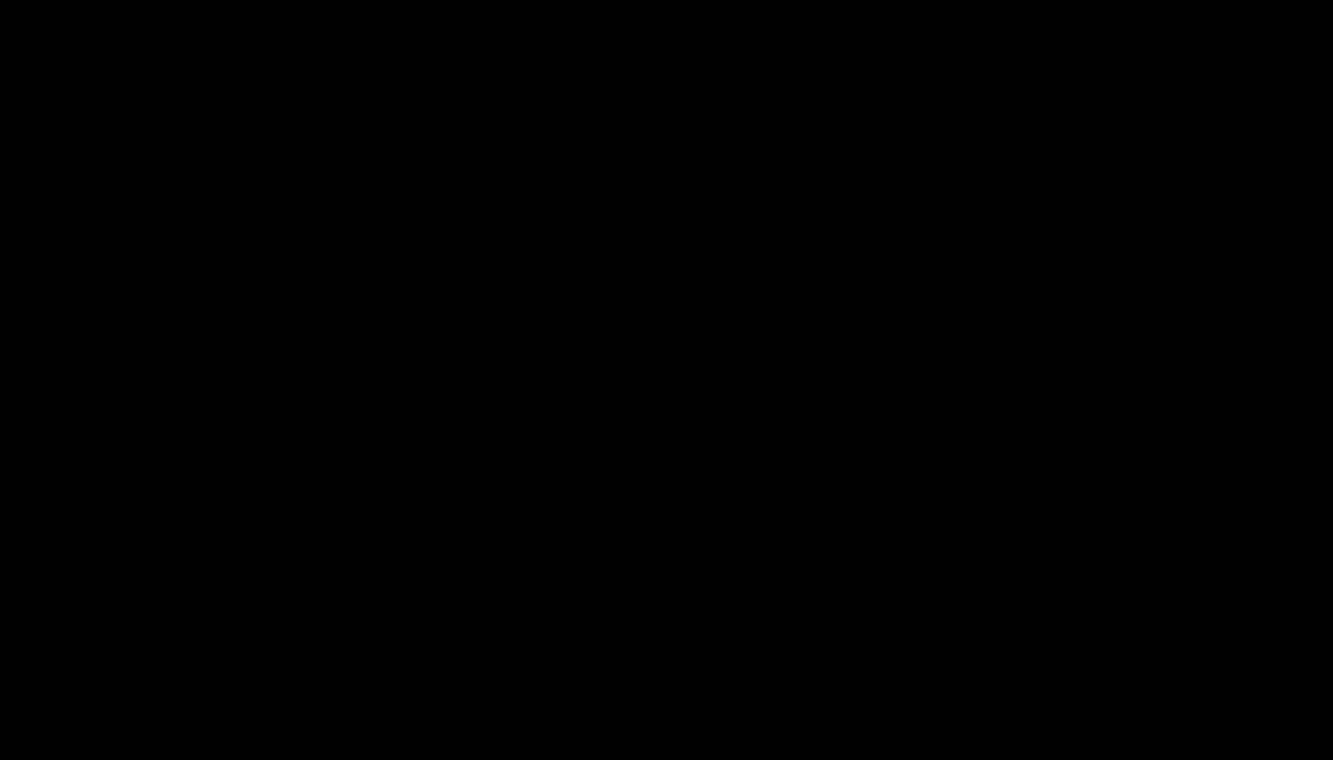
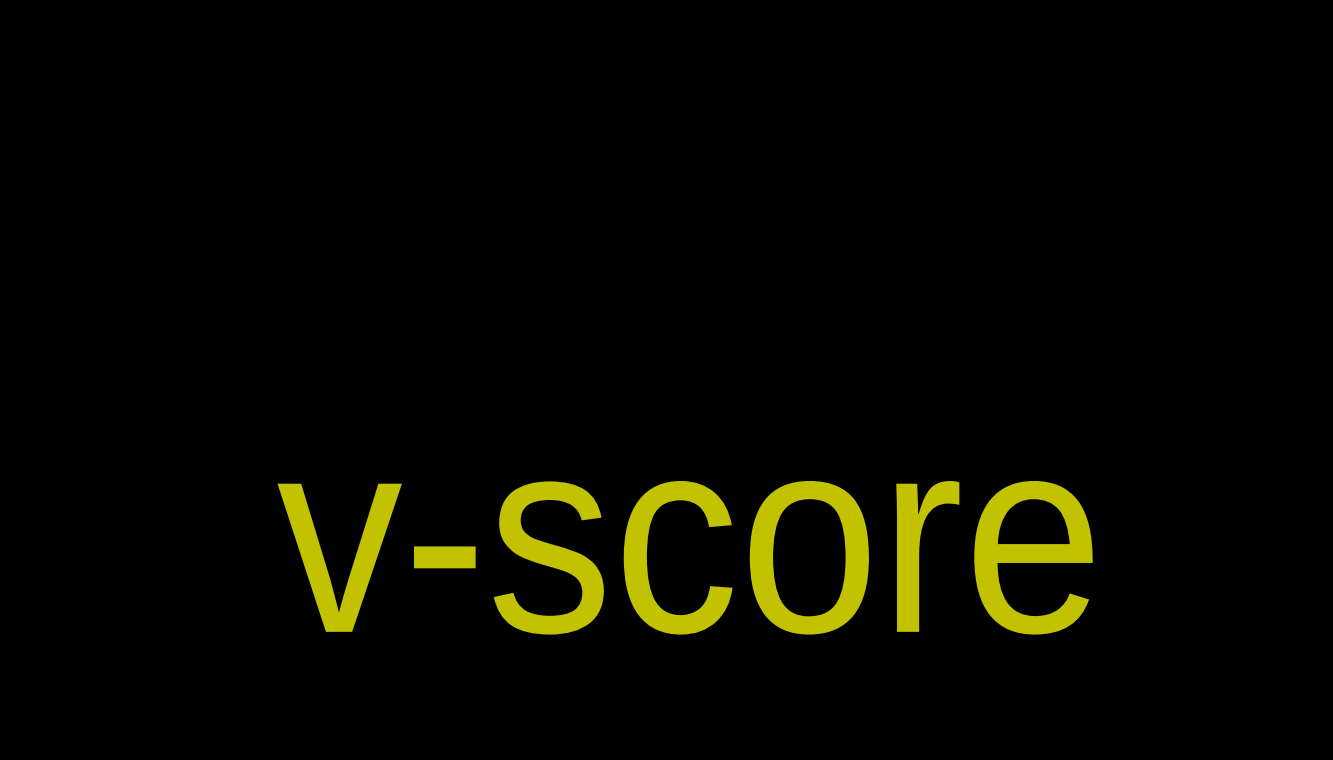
text: none -> v-score (685, 557)

